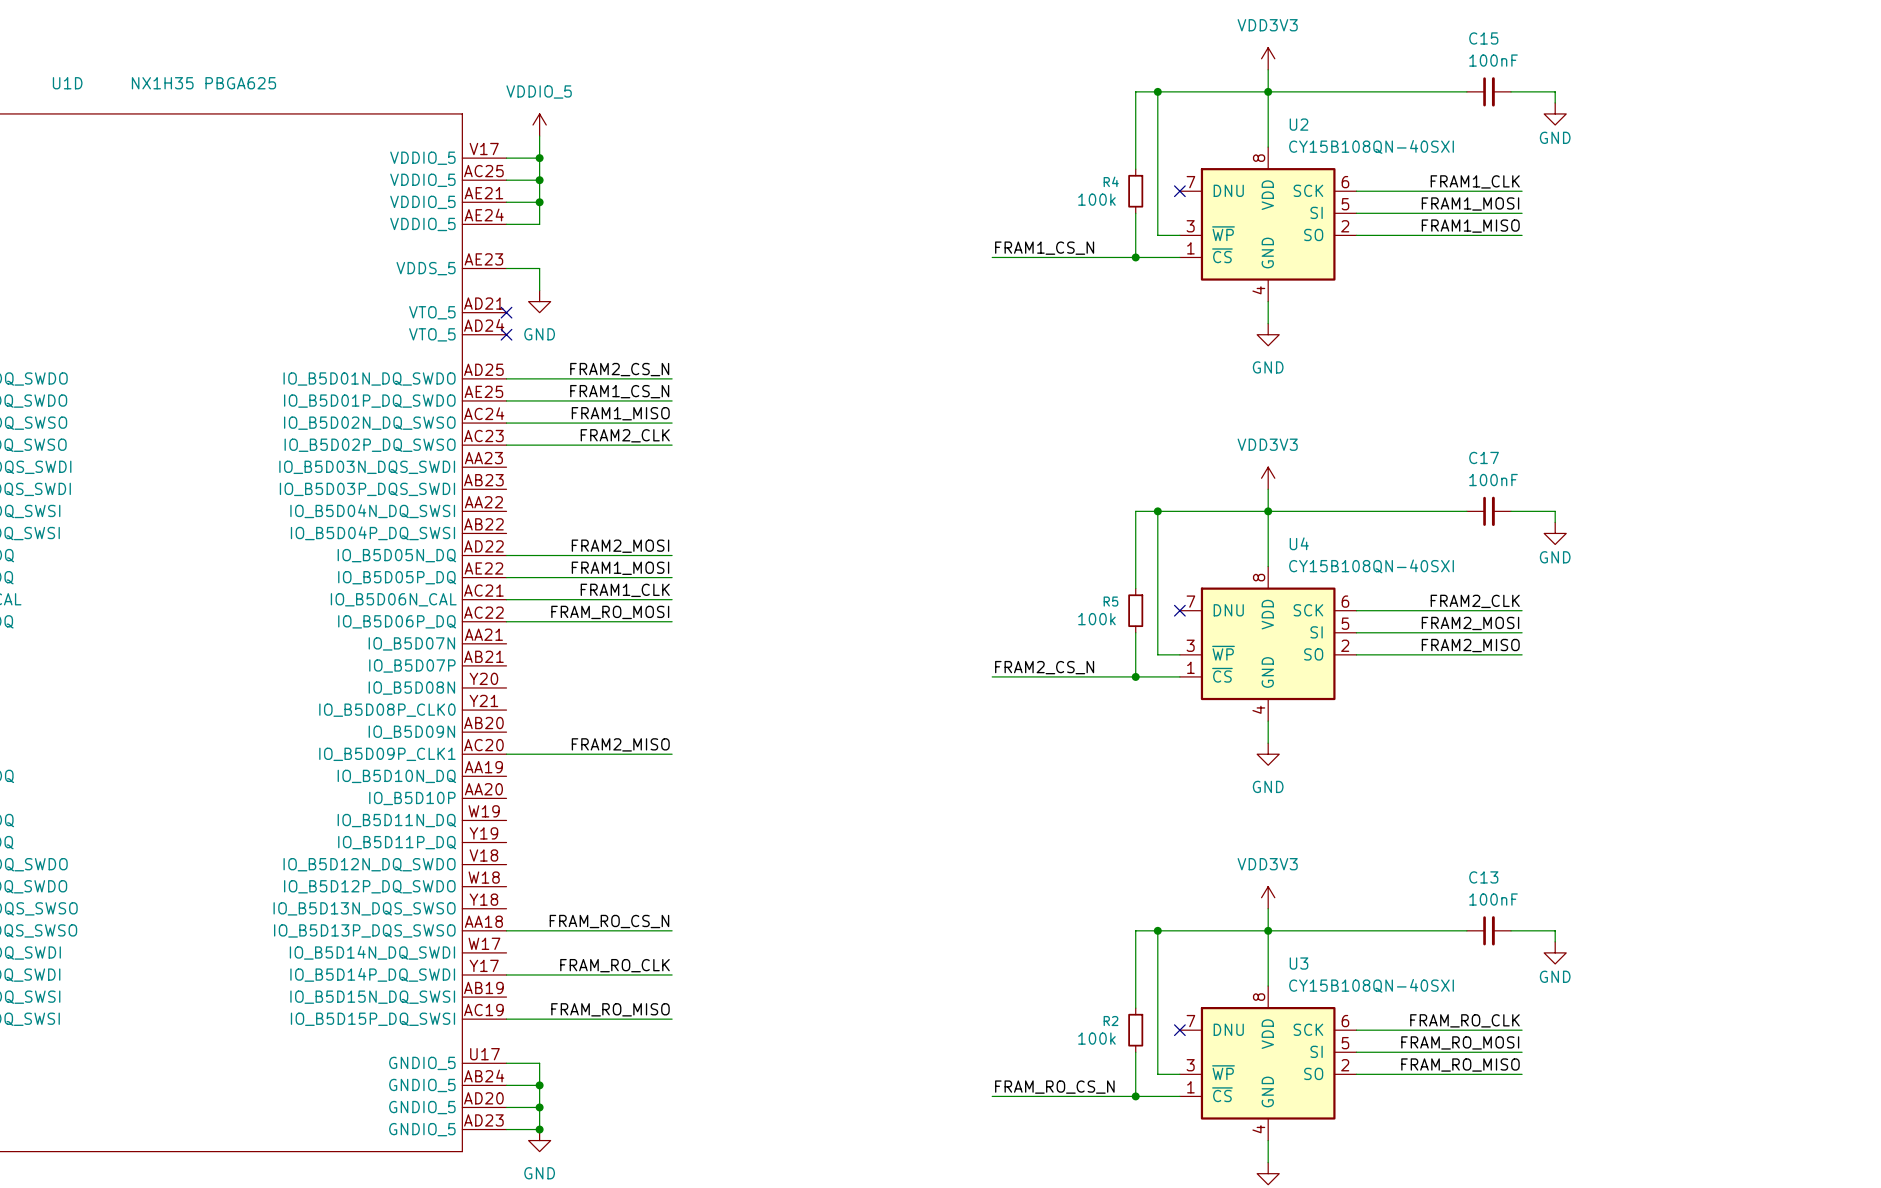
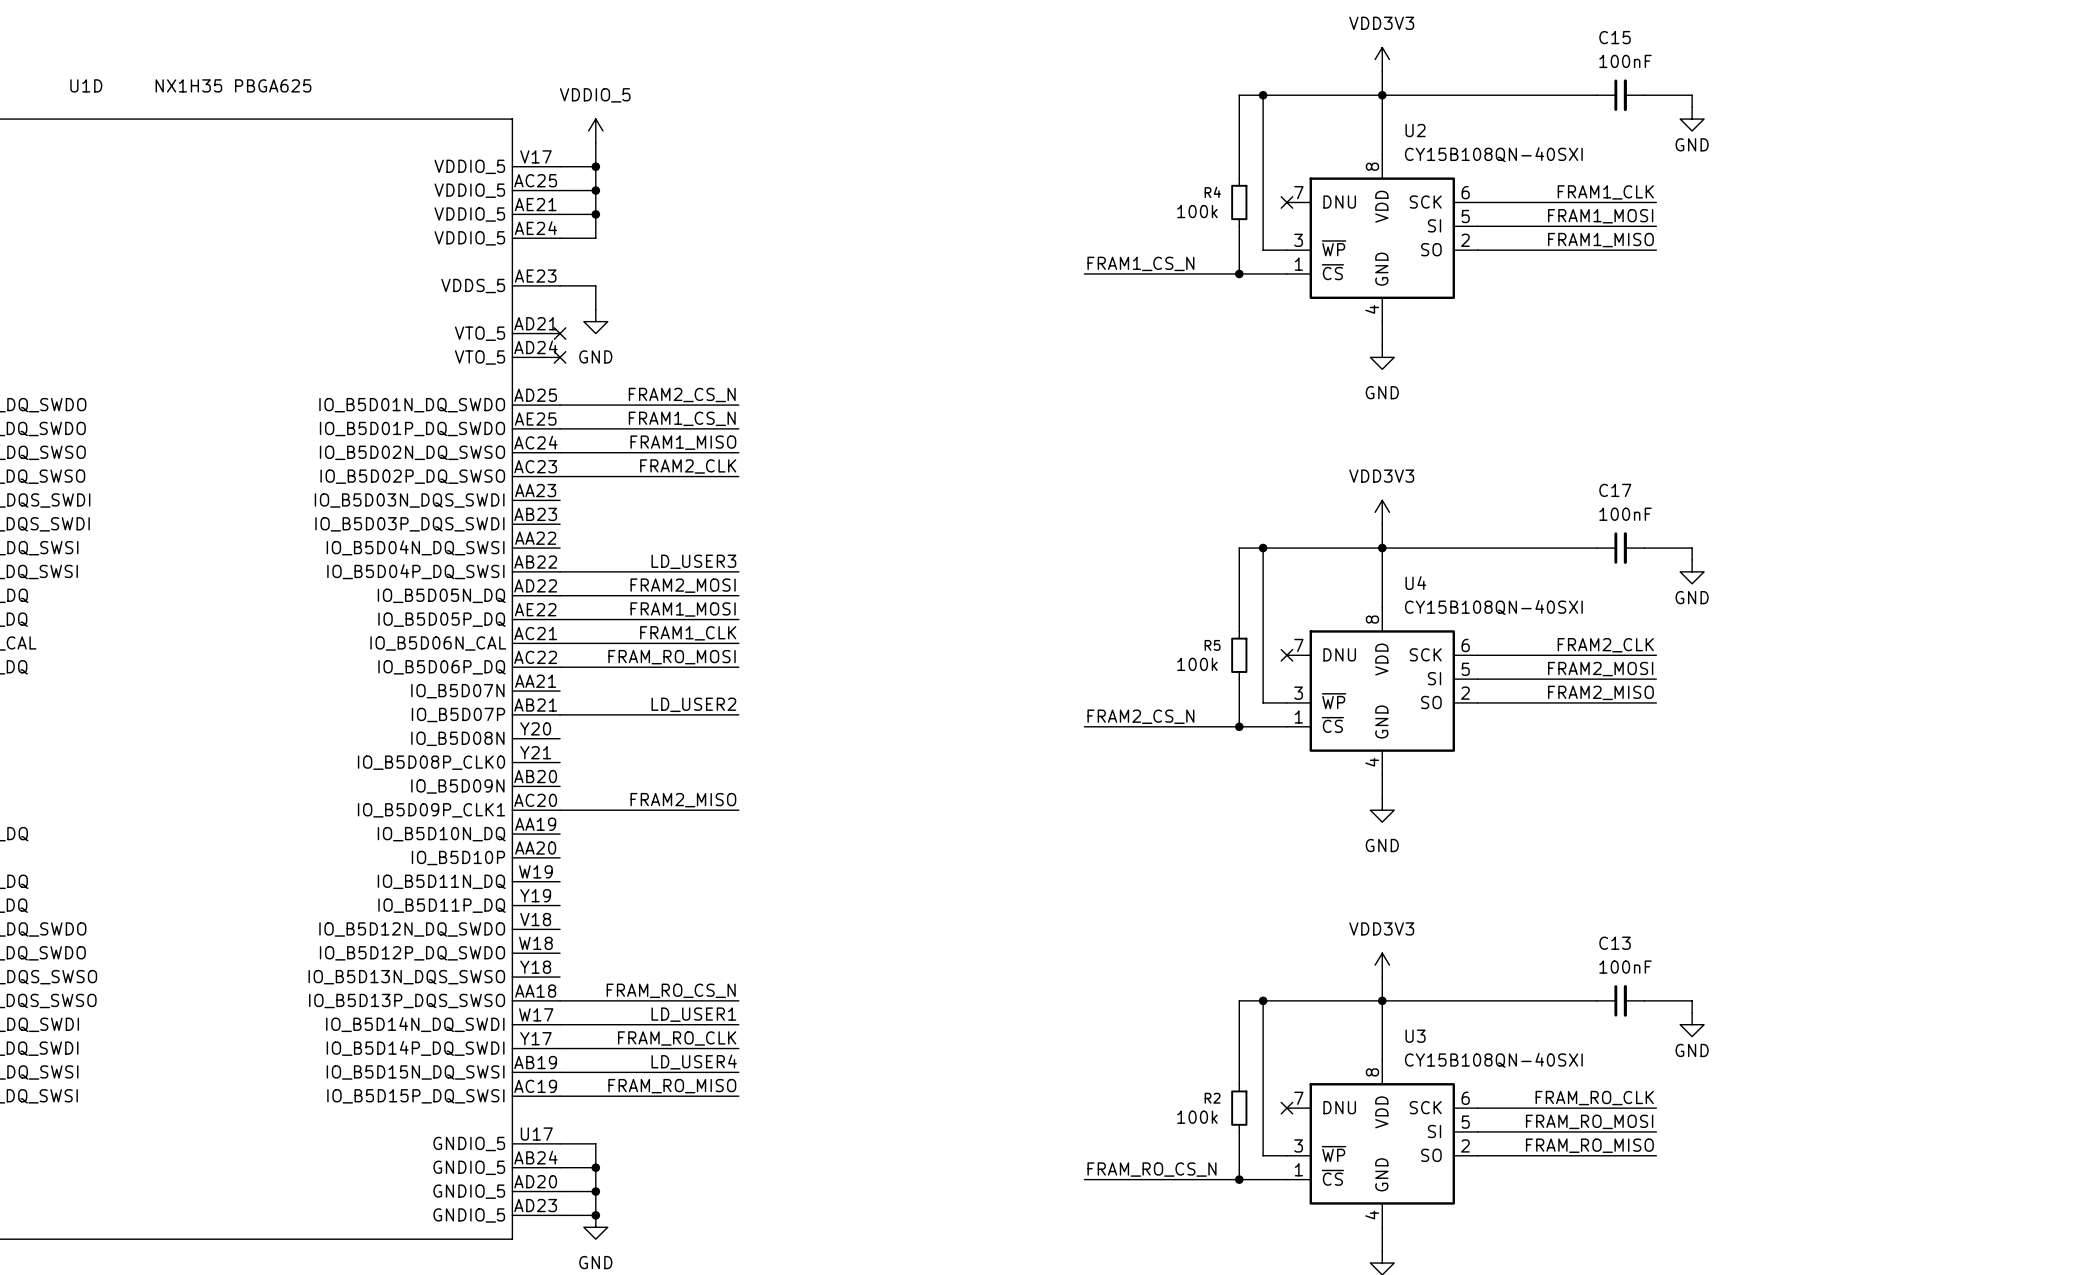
label: none -> LD_USER3 (693, 561)
wire: none -> (560, 571) (738, 571)
label: none -> LD_USER2 (693, 704)
wire: none -> (560, 714) (738, 714)
label: none -> LD_USER1 (693, 1014)
wire: none -> (560, 1024) (738, 1024)
label: none -> LD_USER4 (694, 1062)
wire: none -> (560, 1072) (738, 1072)

